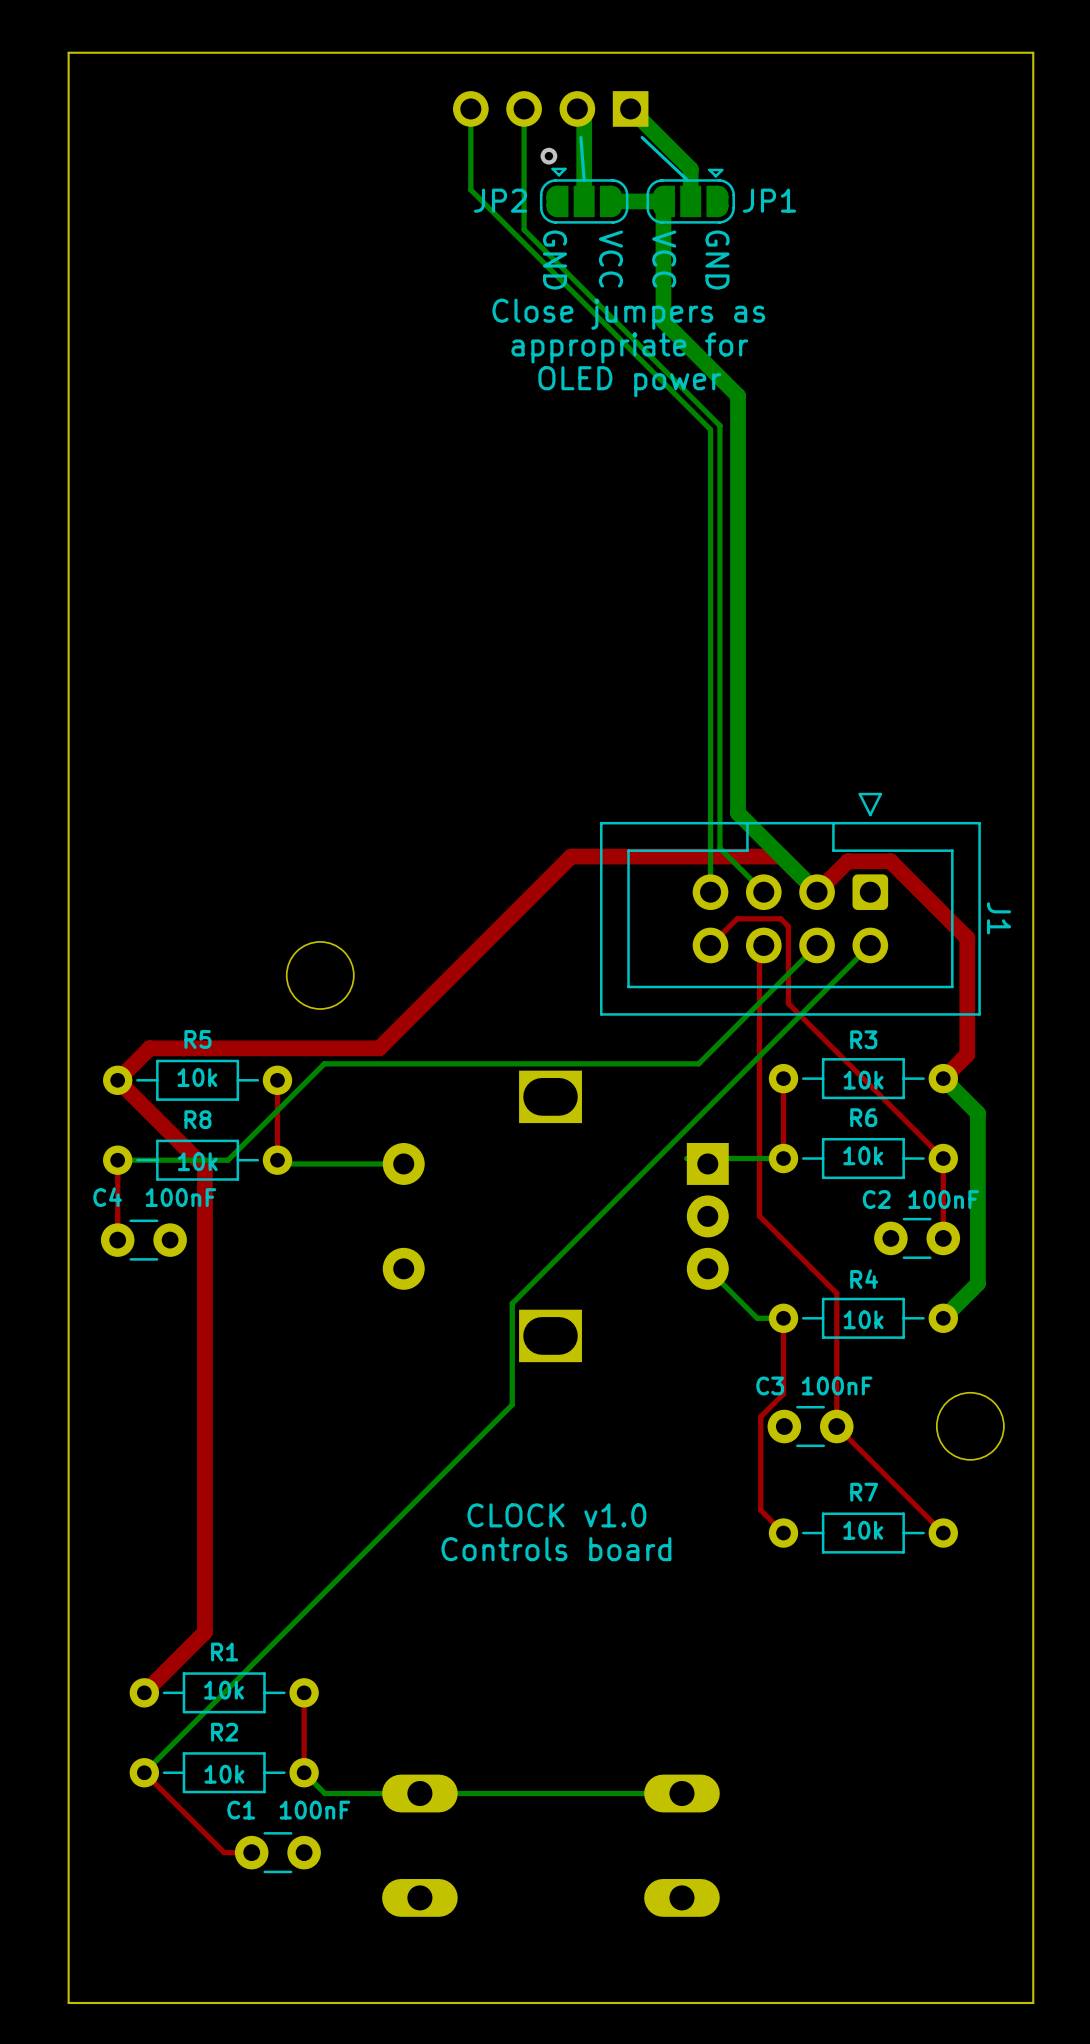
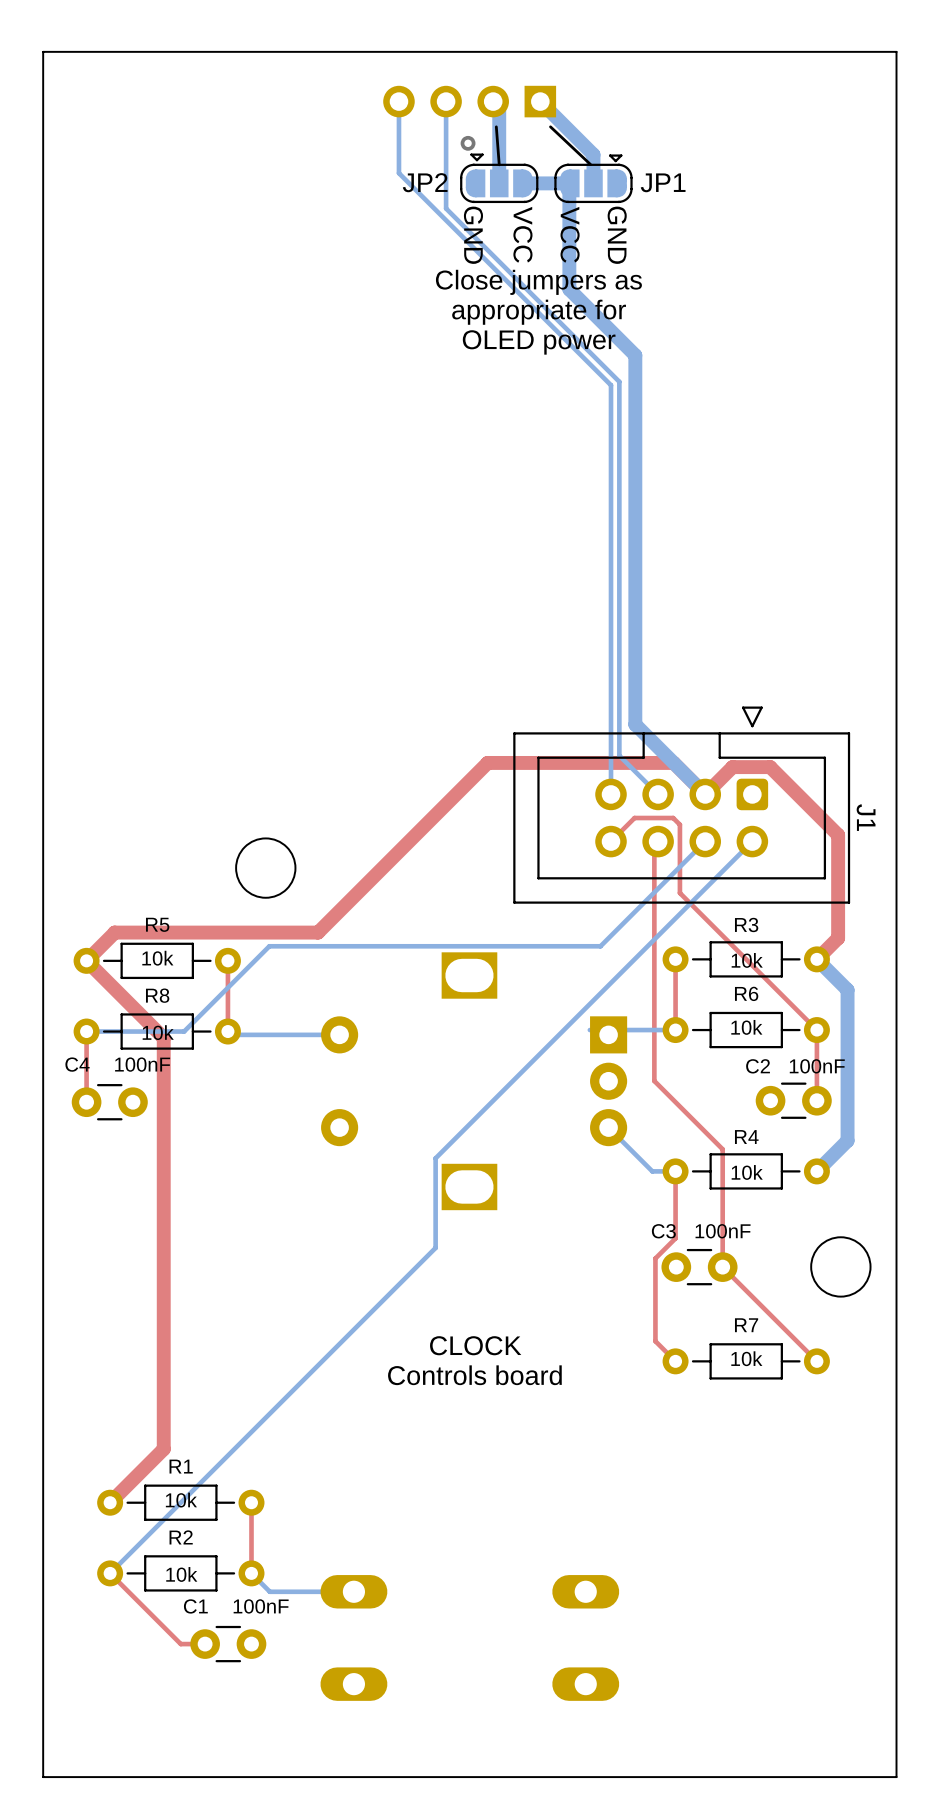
text: CLOCK v1.0 (556, 1515) -> CLOCK (475, 1345)
bottom track: (681, 1793) (419, 1793) -> none

